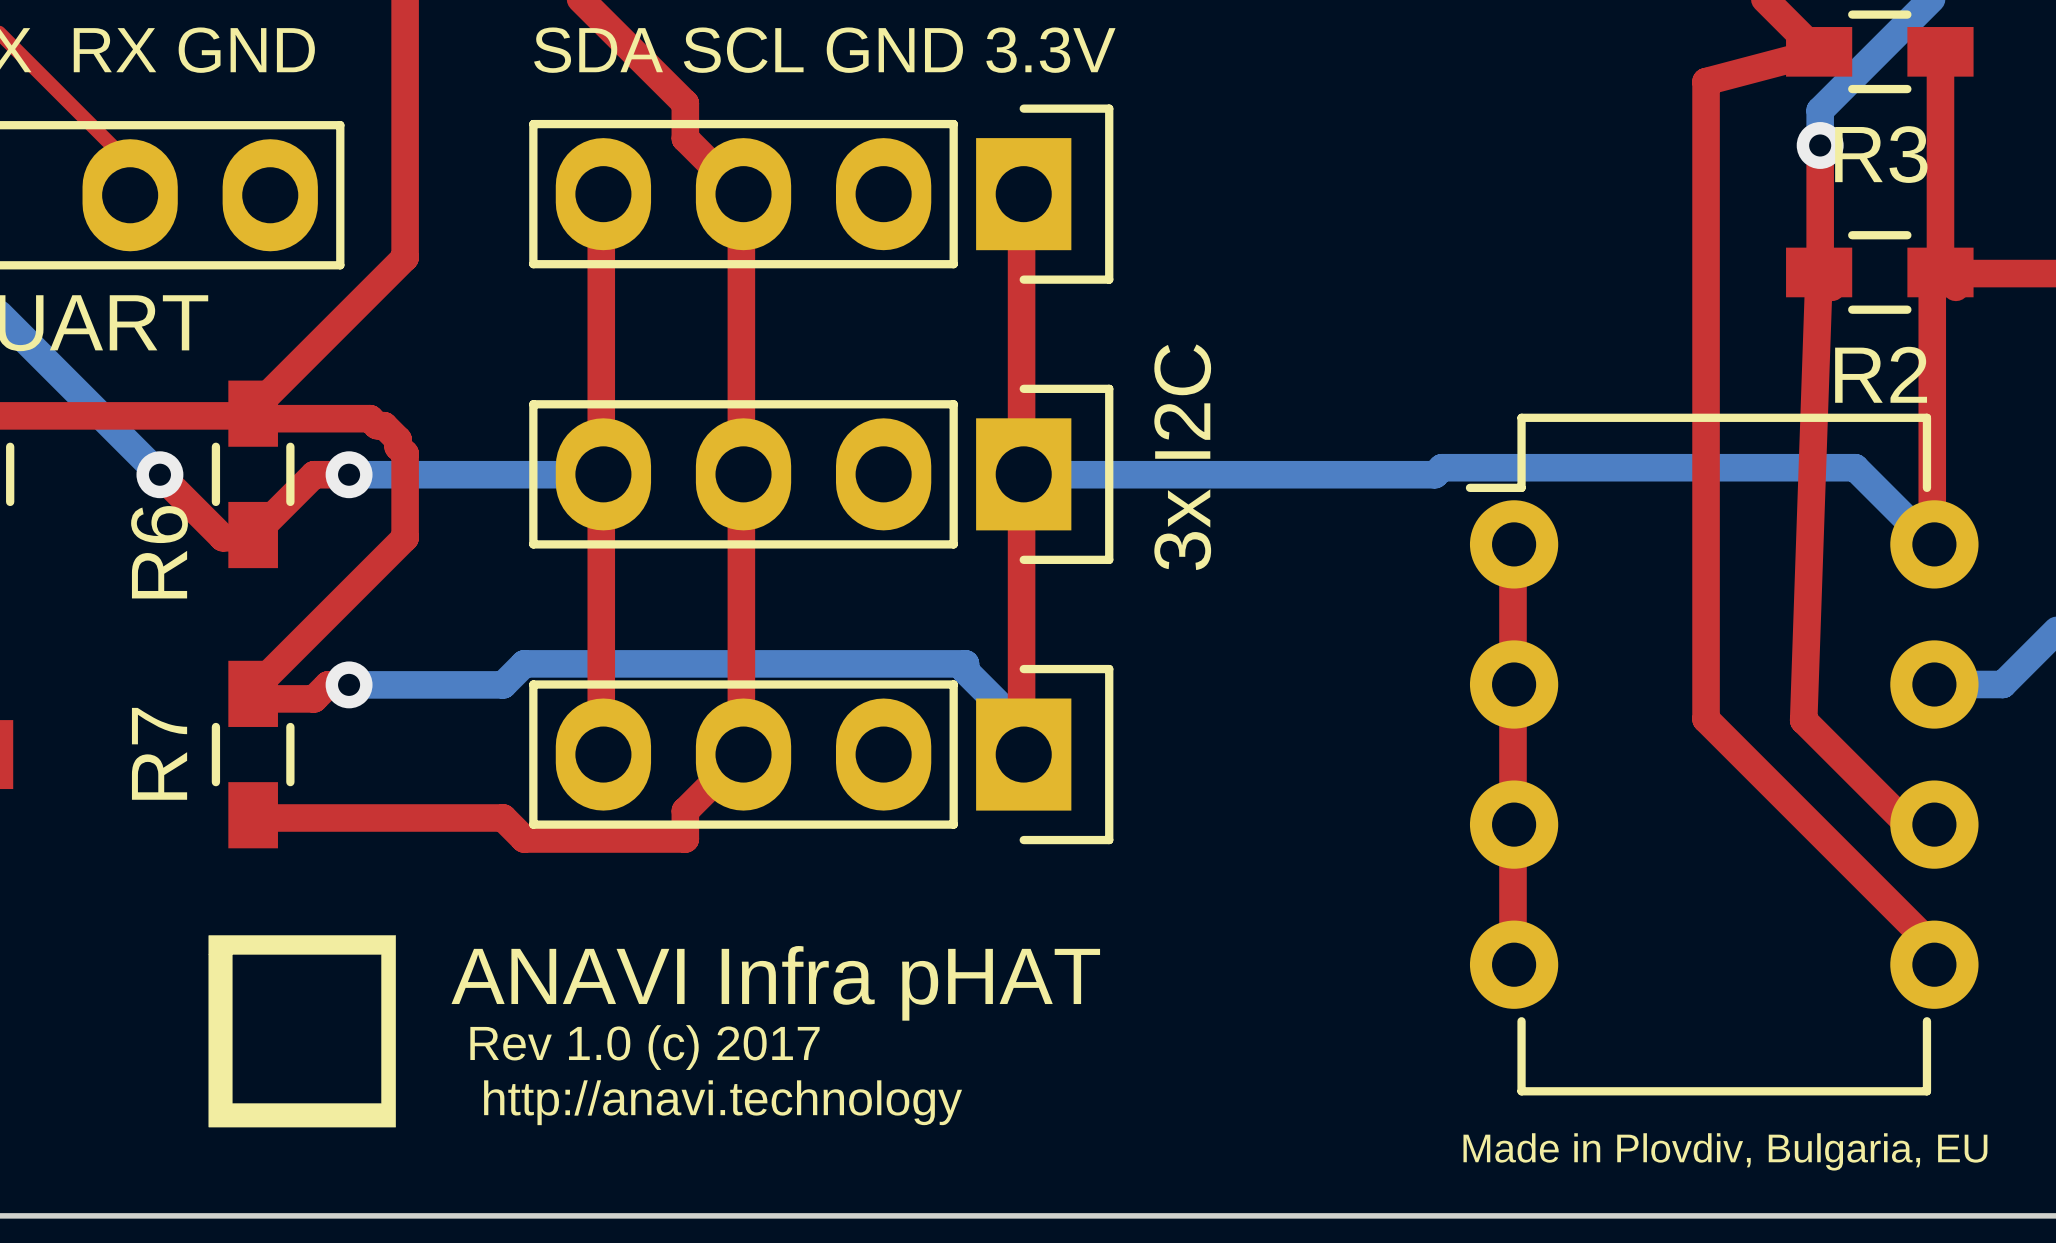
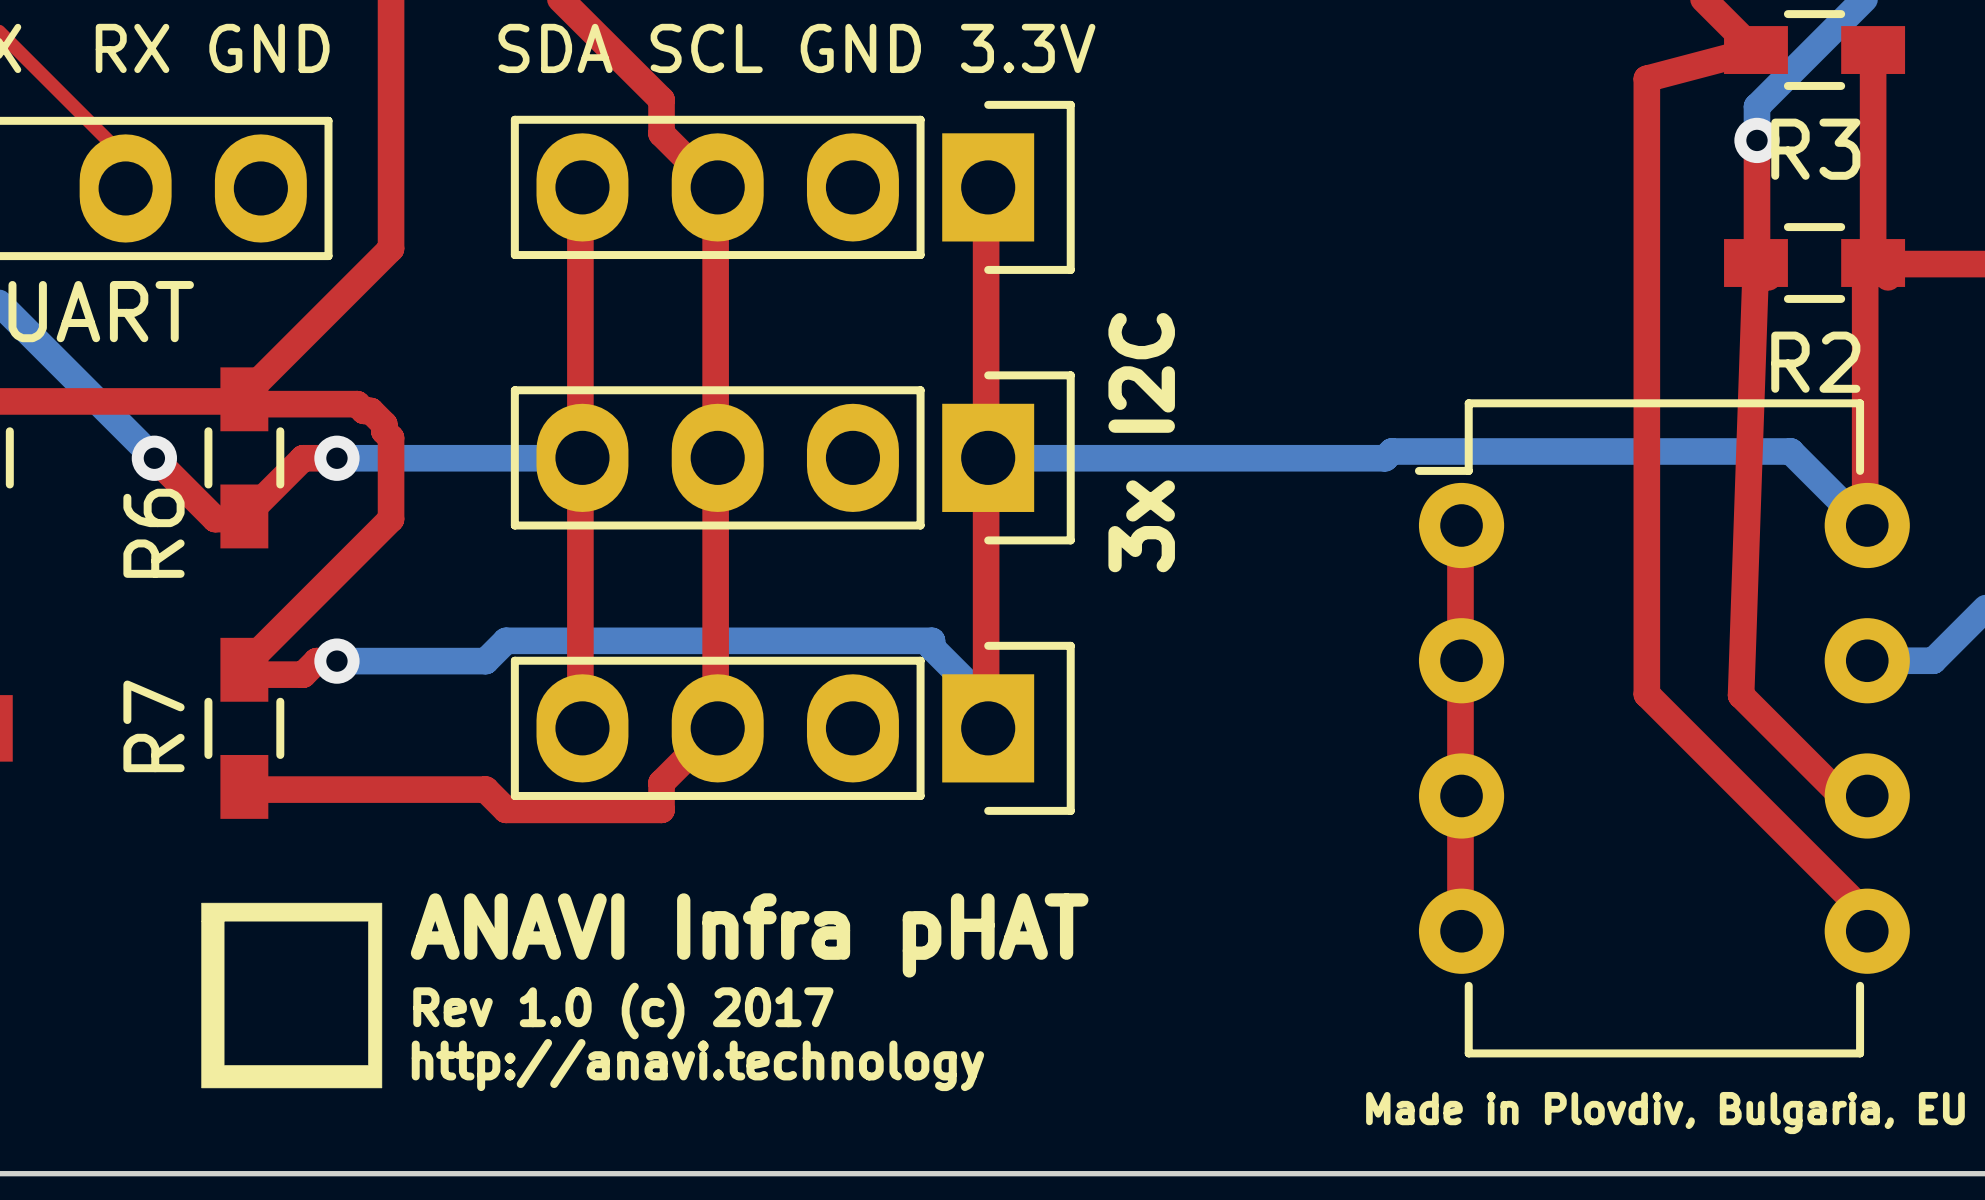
text position: ANAVI Infra pHAT (775, 983) -> ANAVI Infra pHAT (749, 935)

